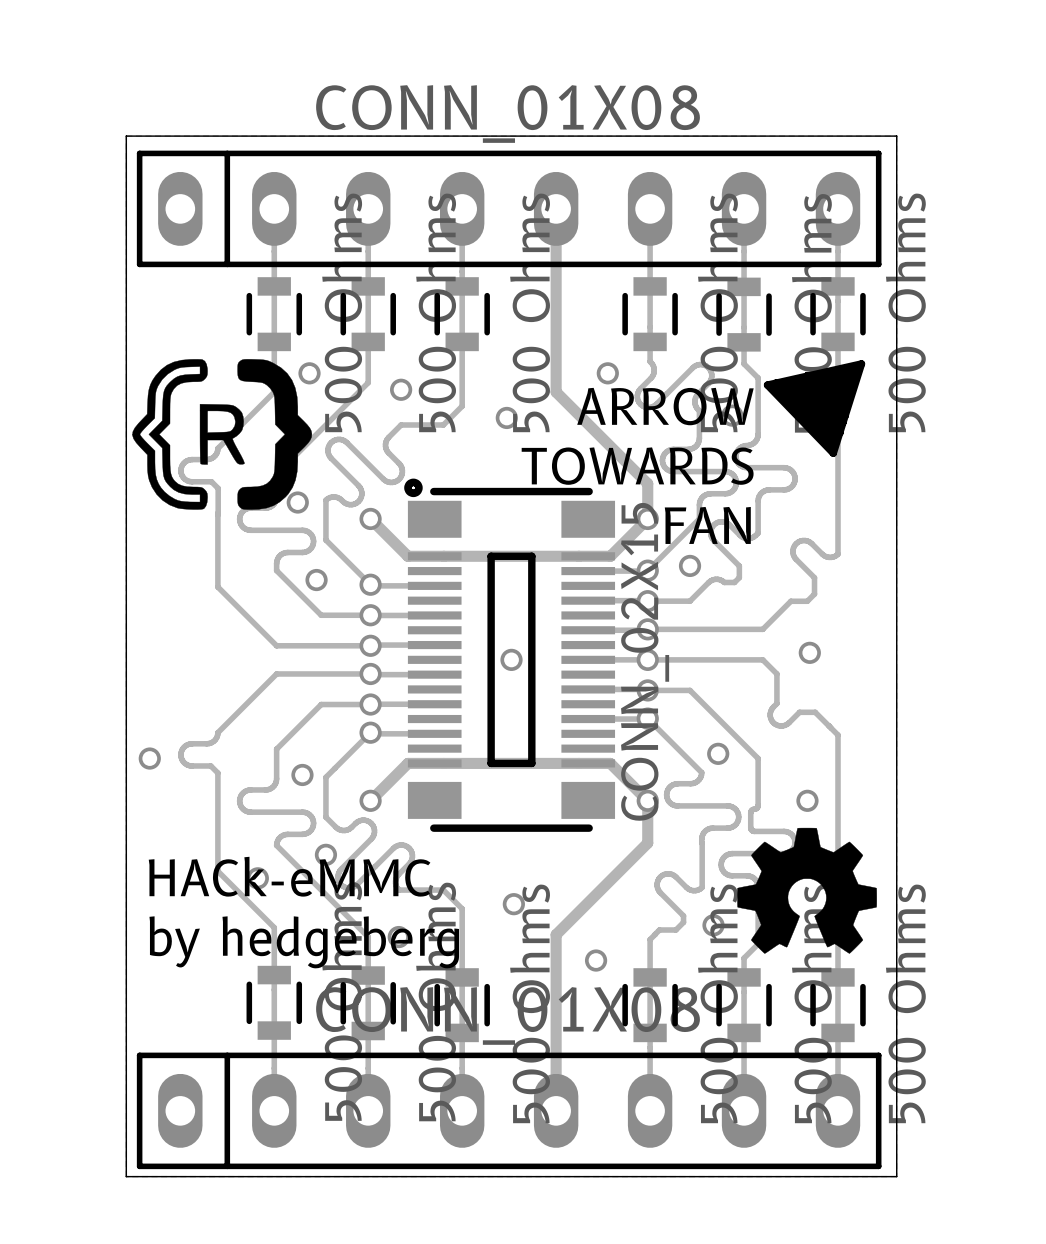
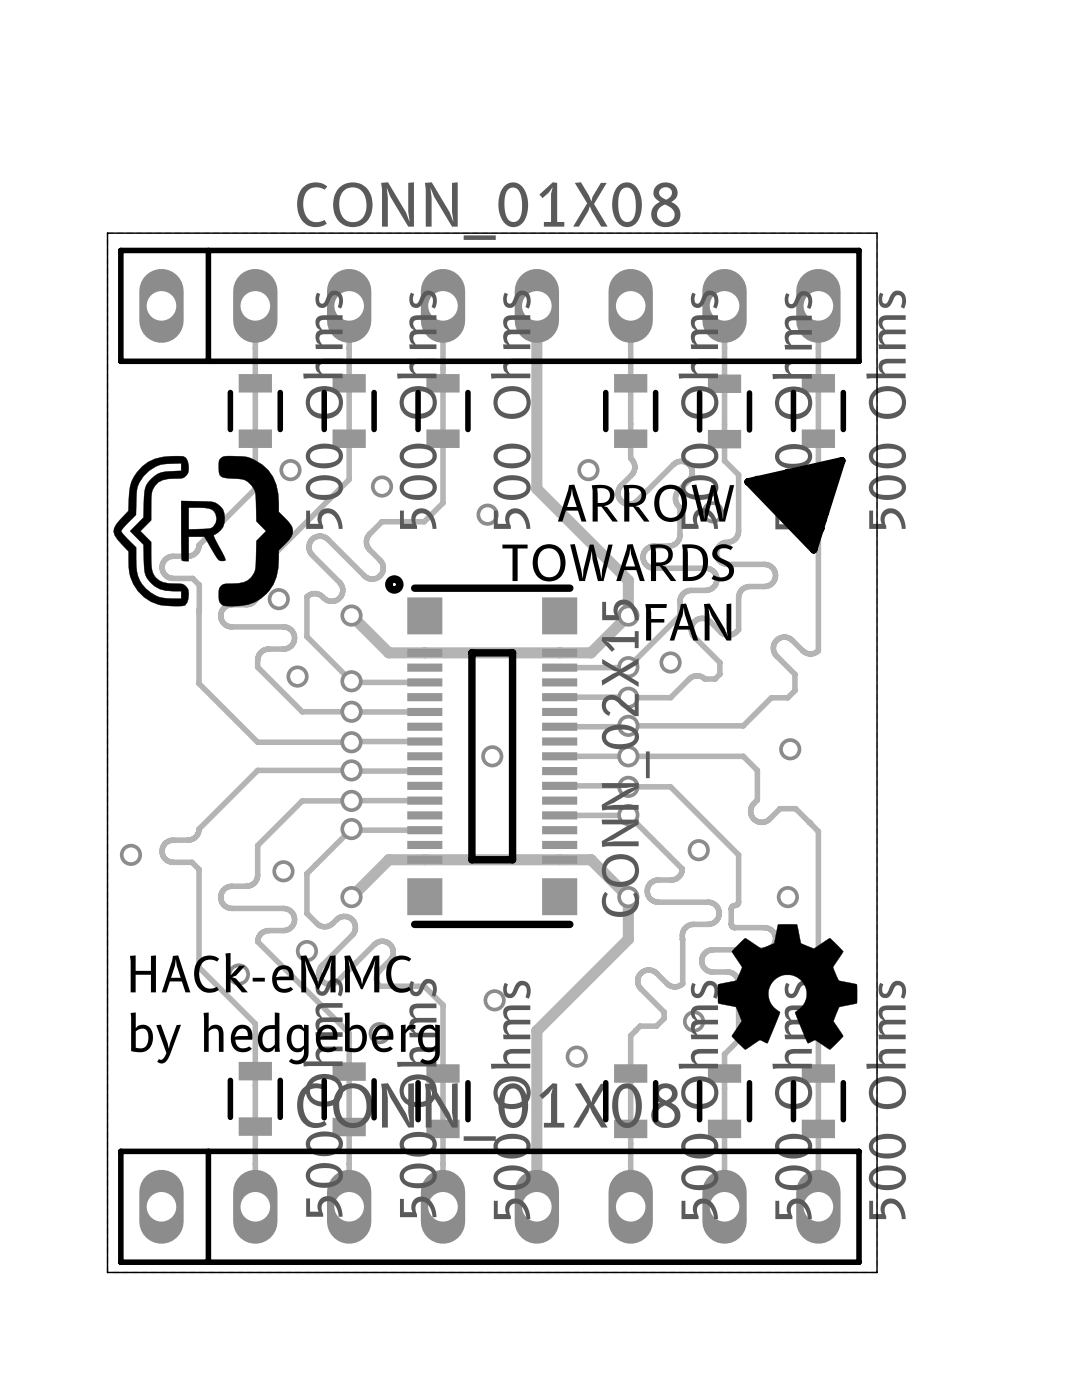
part footprint: [404, 478, 616, 832] -> [385, 575, 578, 929]

